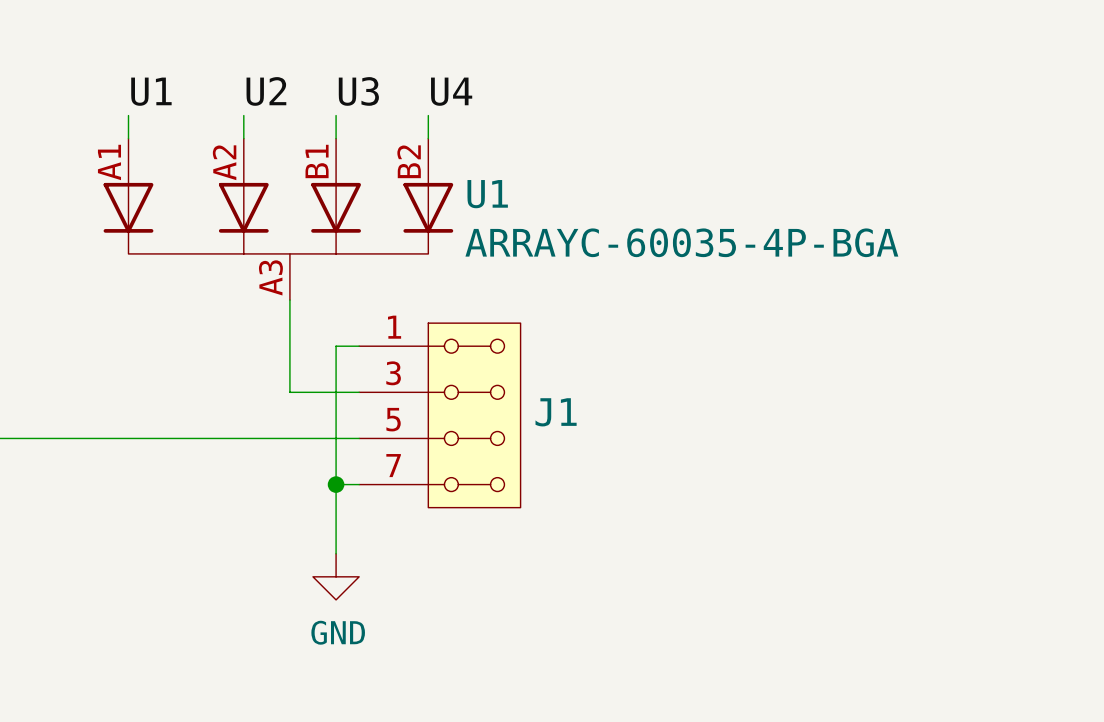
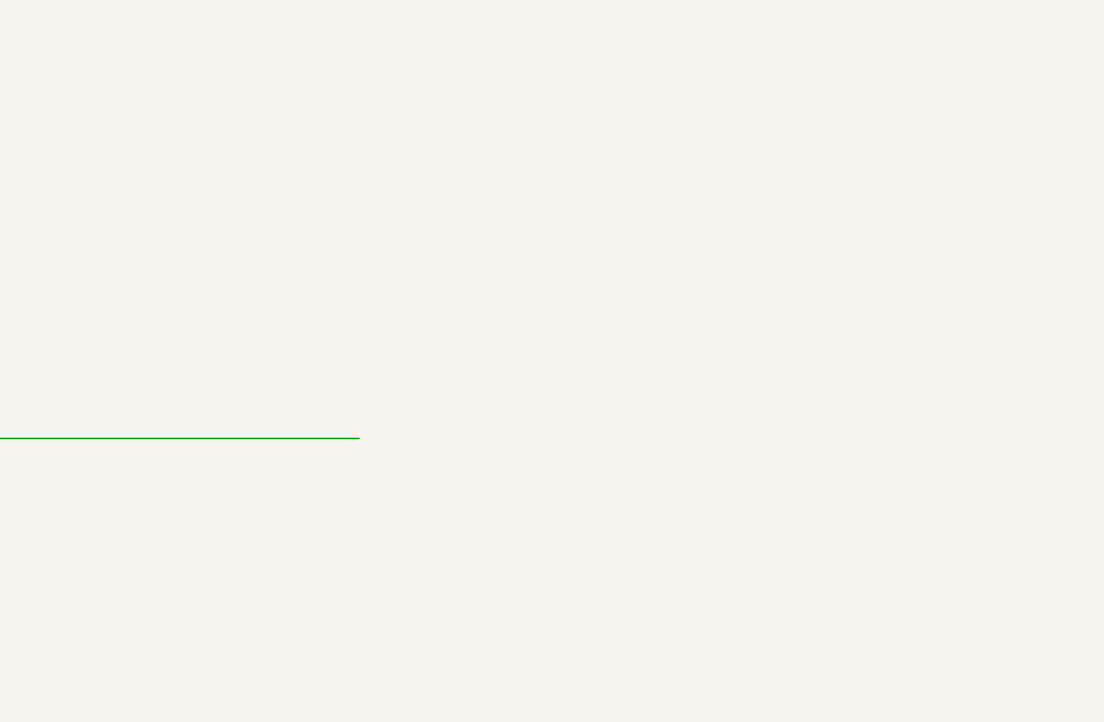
label: U1 (151, 91) -> none
label: U2 (266, 91) -> none
label: U3 (358, 91) -> none
label: U4 (451, 91) -> none
wire: (128, 115) (128, 138) -> none
wire: (243, 115) (243, 138) -> none
wire: (336, 115) (336, 138) -> none
wire: (428, 115) (428, 138) -> none
U1: ARRAYC-60035-4P-BGA (278, 219) -> none
wire: (289, 300) (289, 392) (359, 392) -> none
wire: (359, 346) (336, 346) (336, 553) -> none
J1: (439, 415) -> none
wire: (336, 484) (359, 484) -> none
junction: (336, 484) -> none
power symbol: GND (336, 576) -> none

